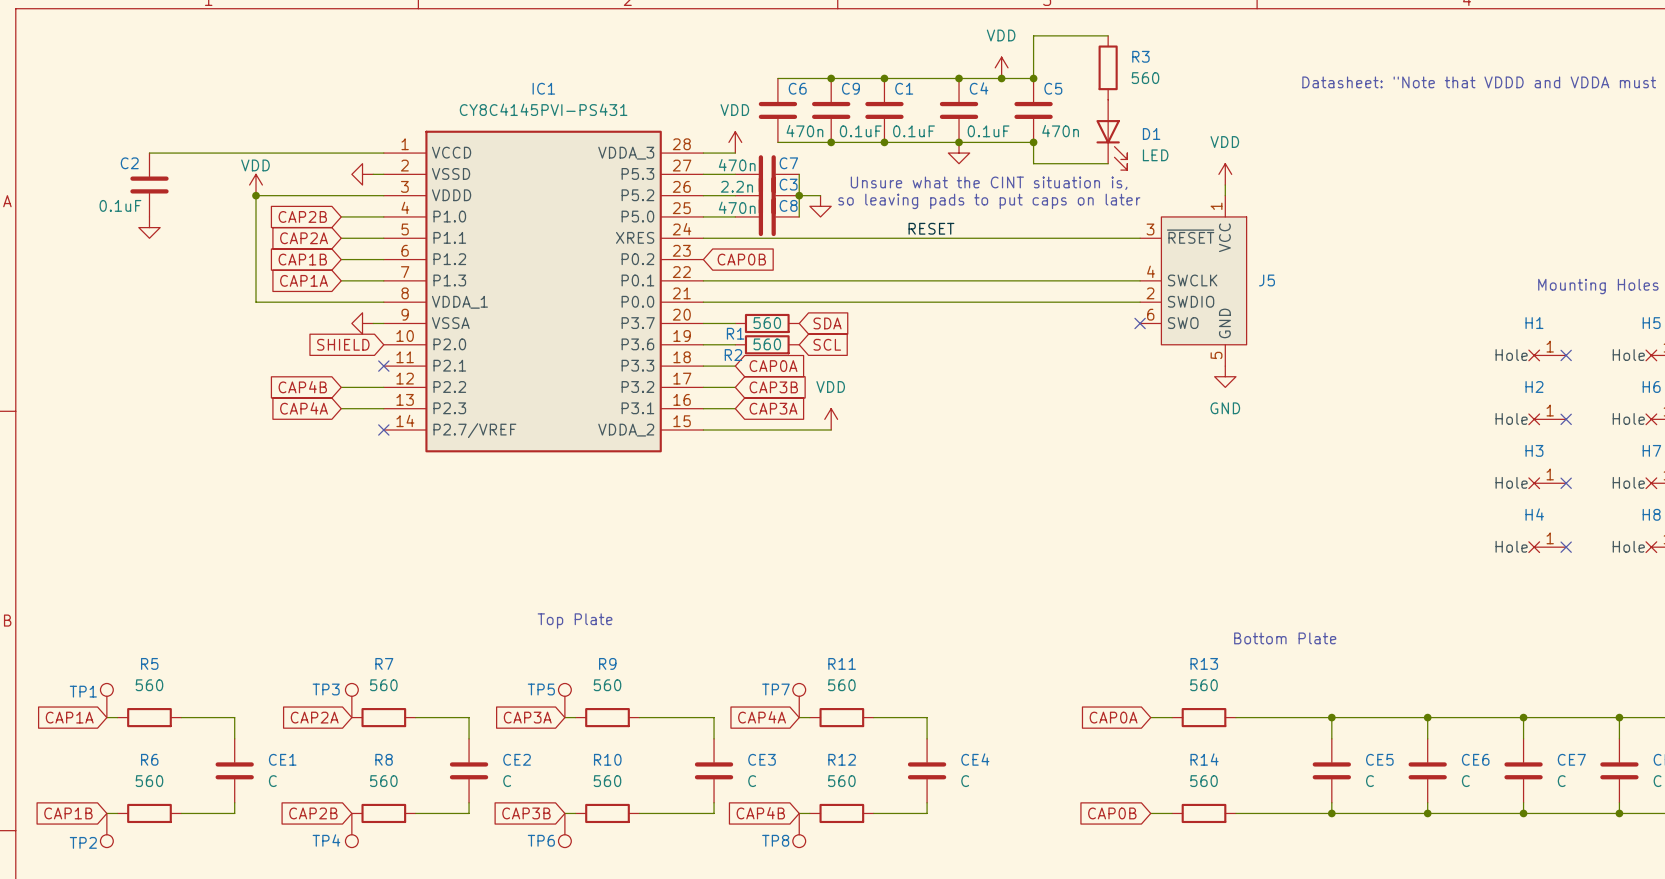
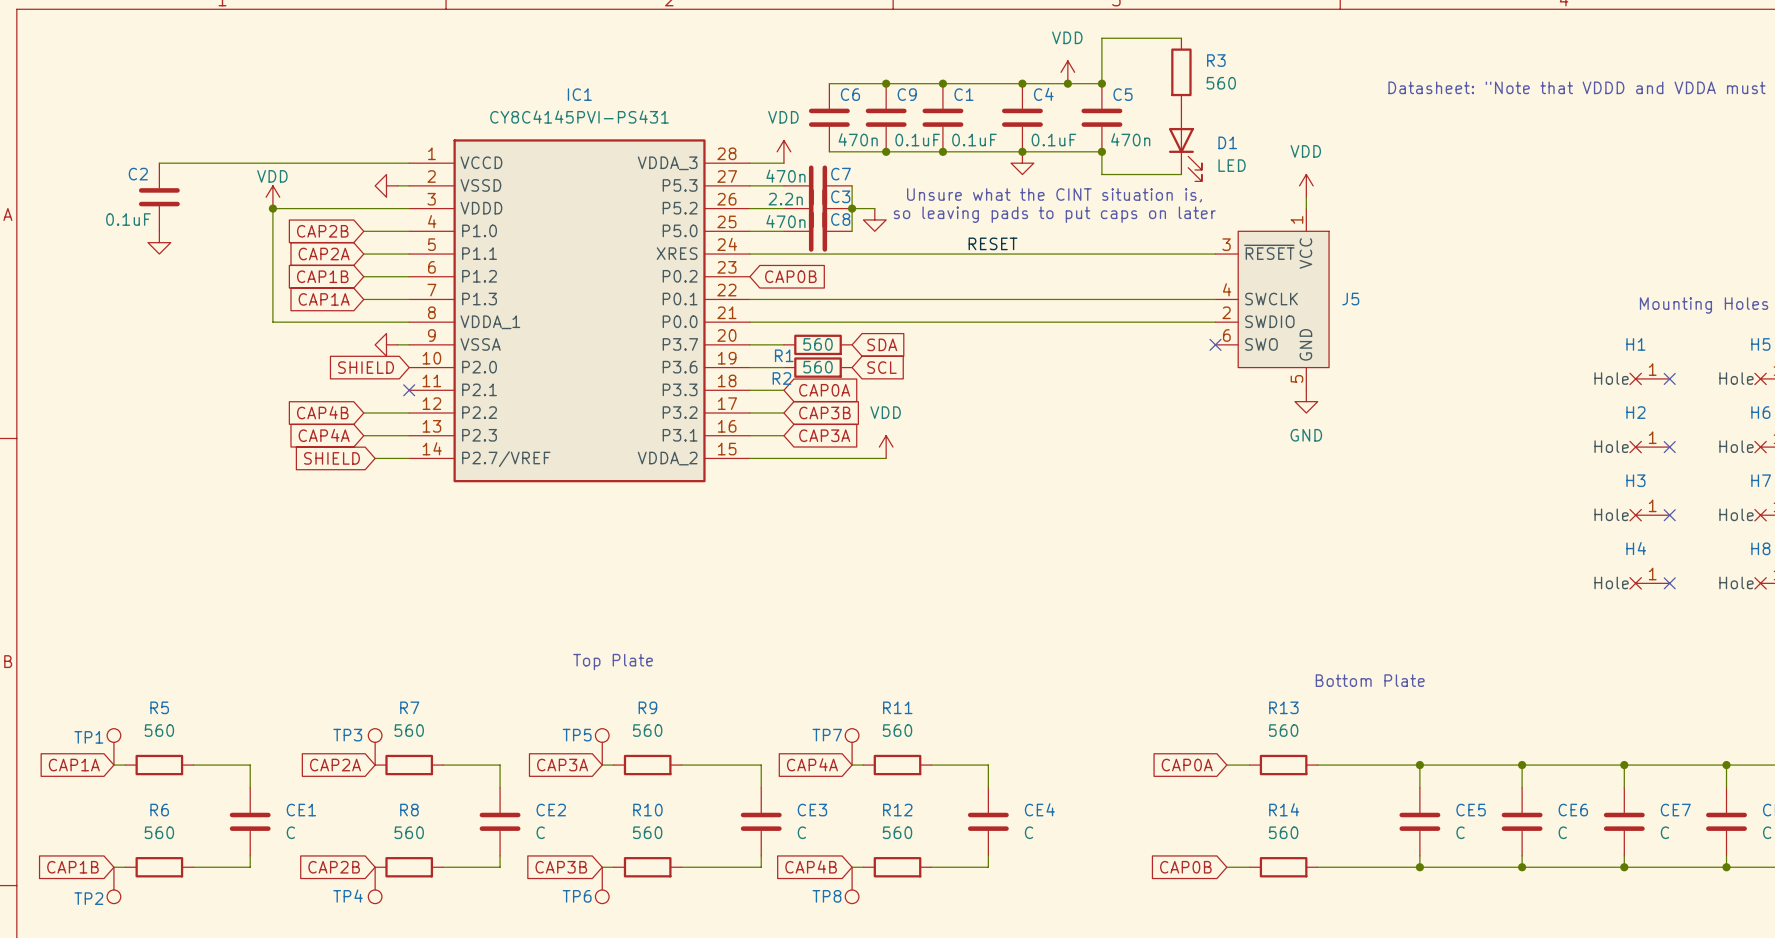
global label: none -> SHIELD (331, 458)
wire: none -> (375, 458) (409, 458)
no-connect mark: (383, 429) -> none

